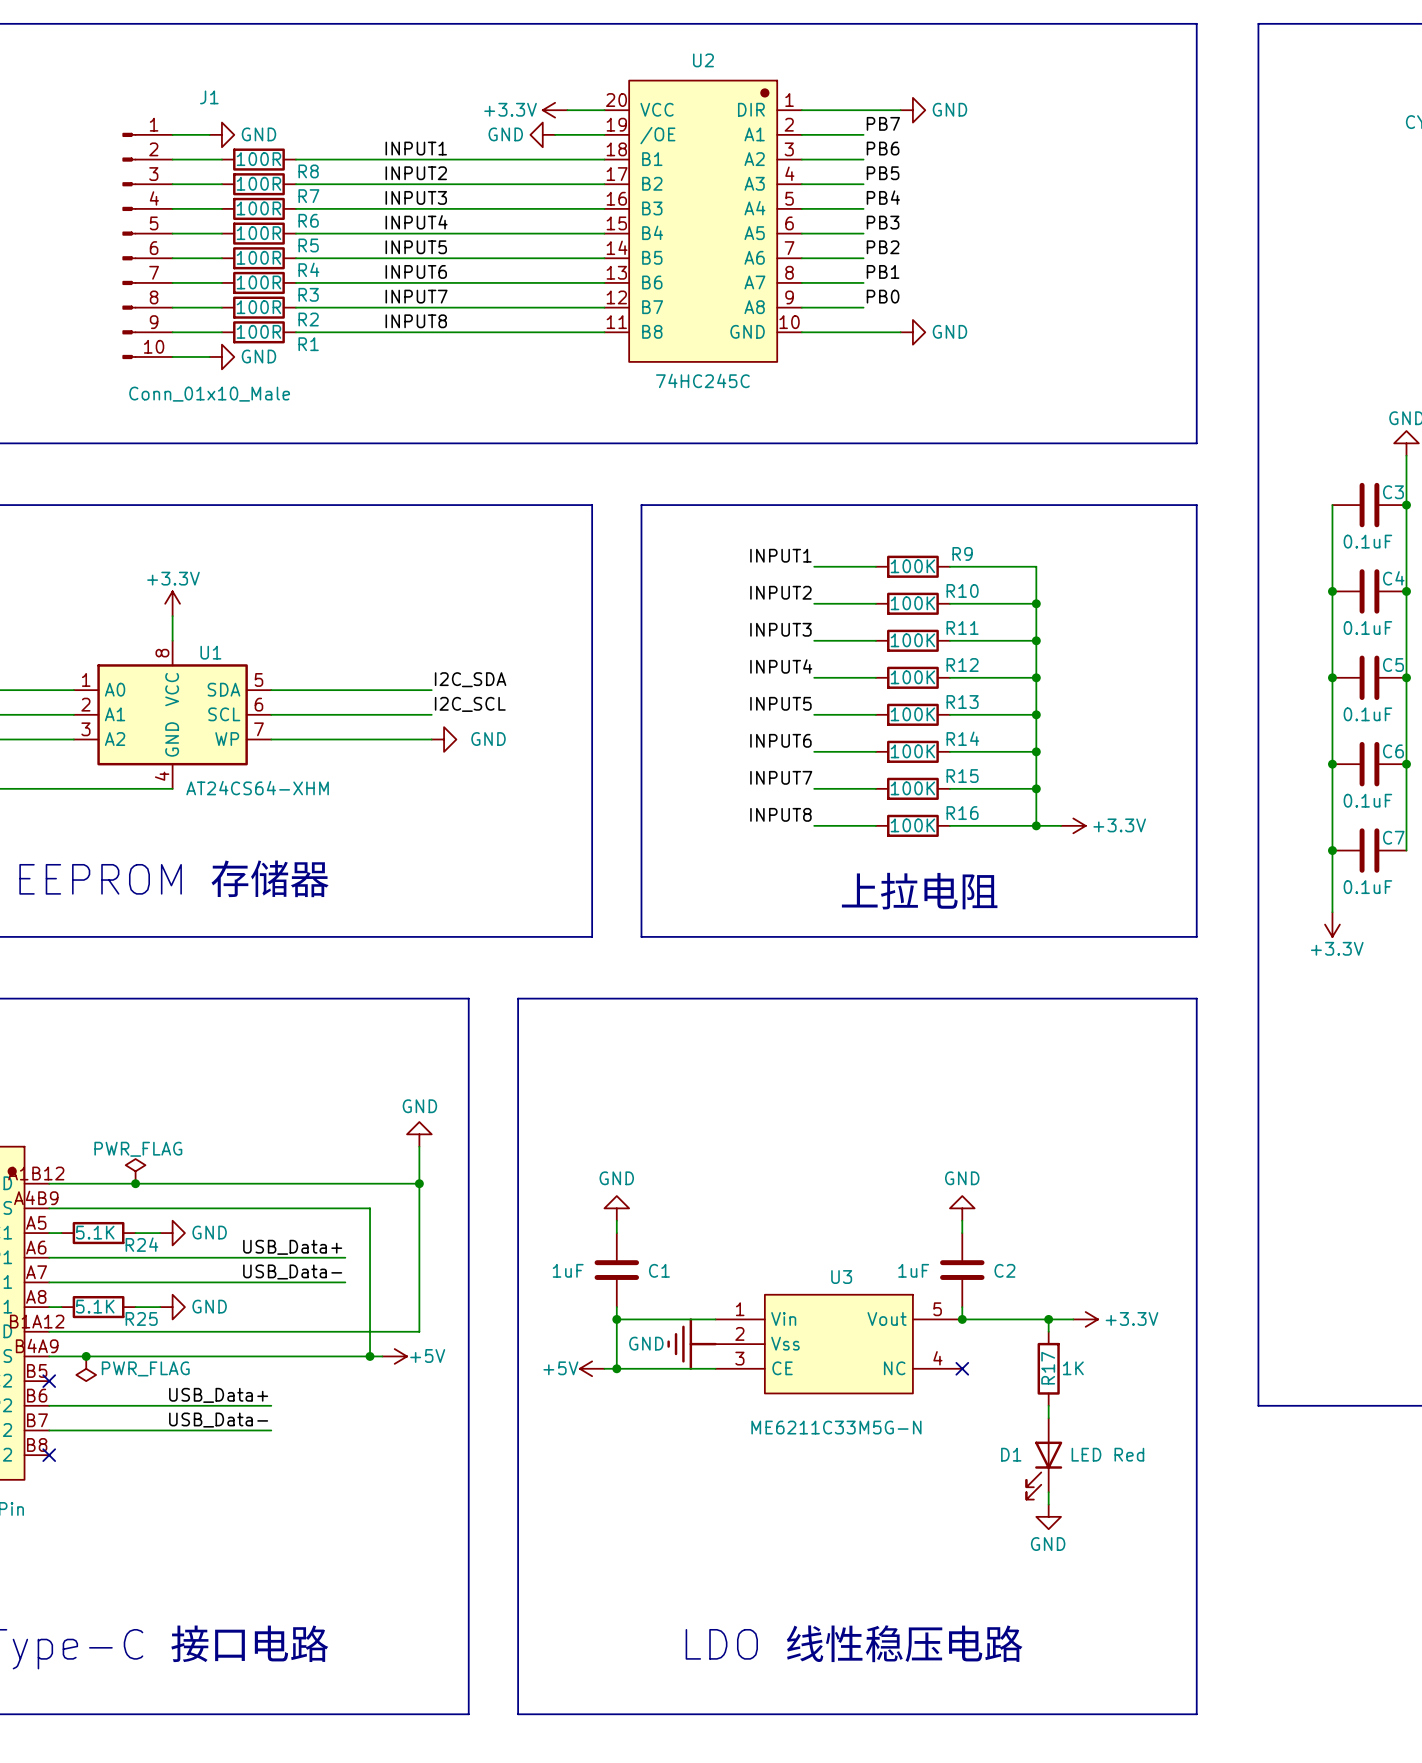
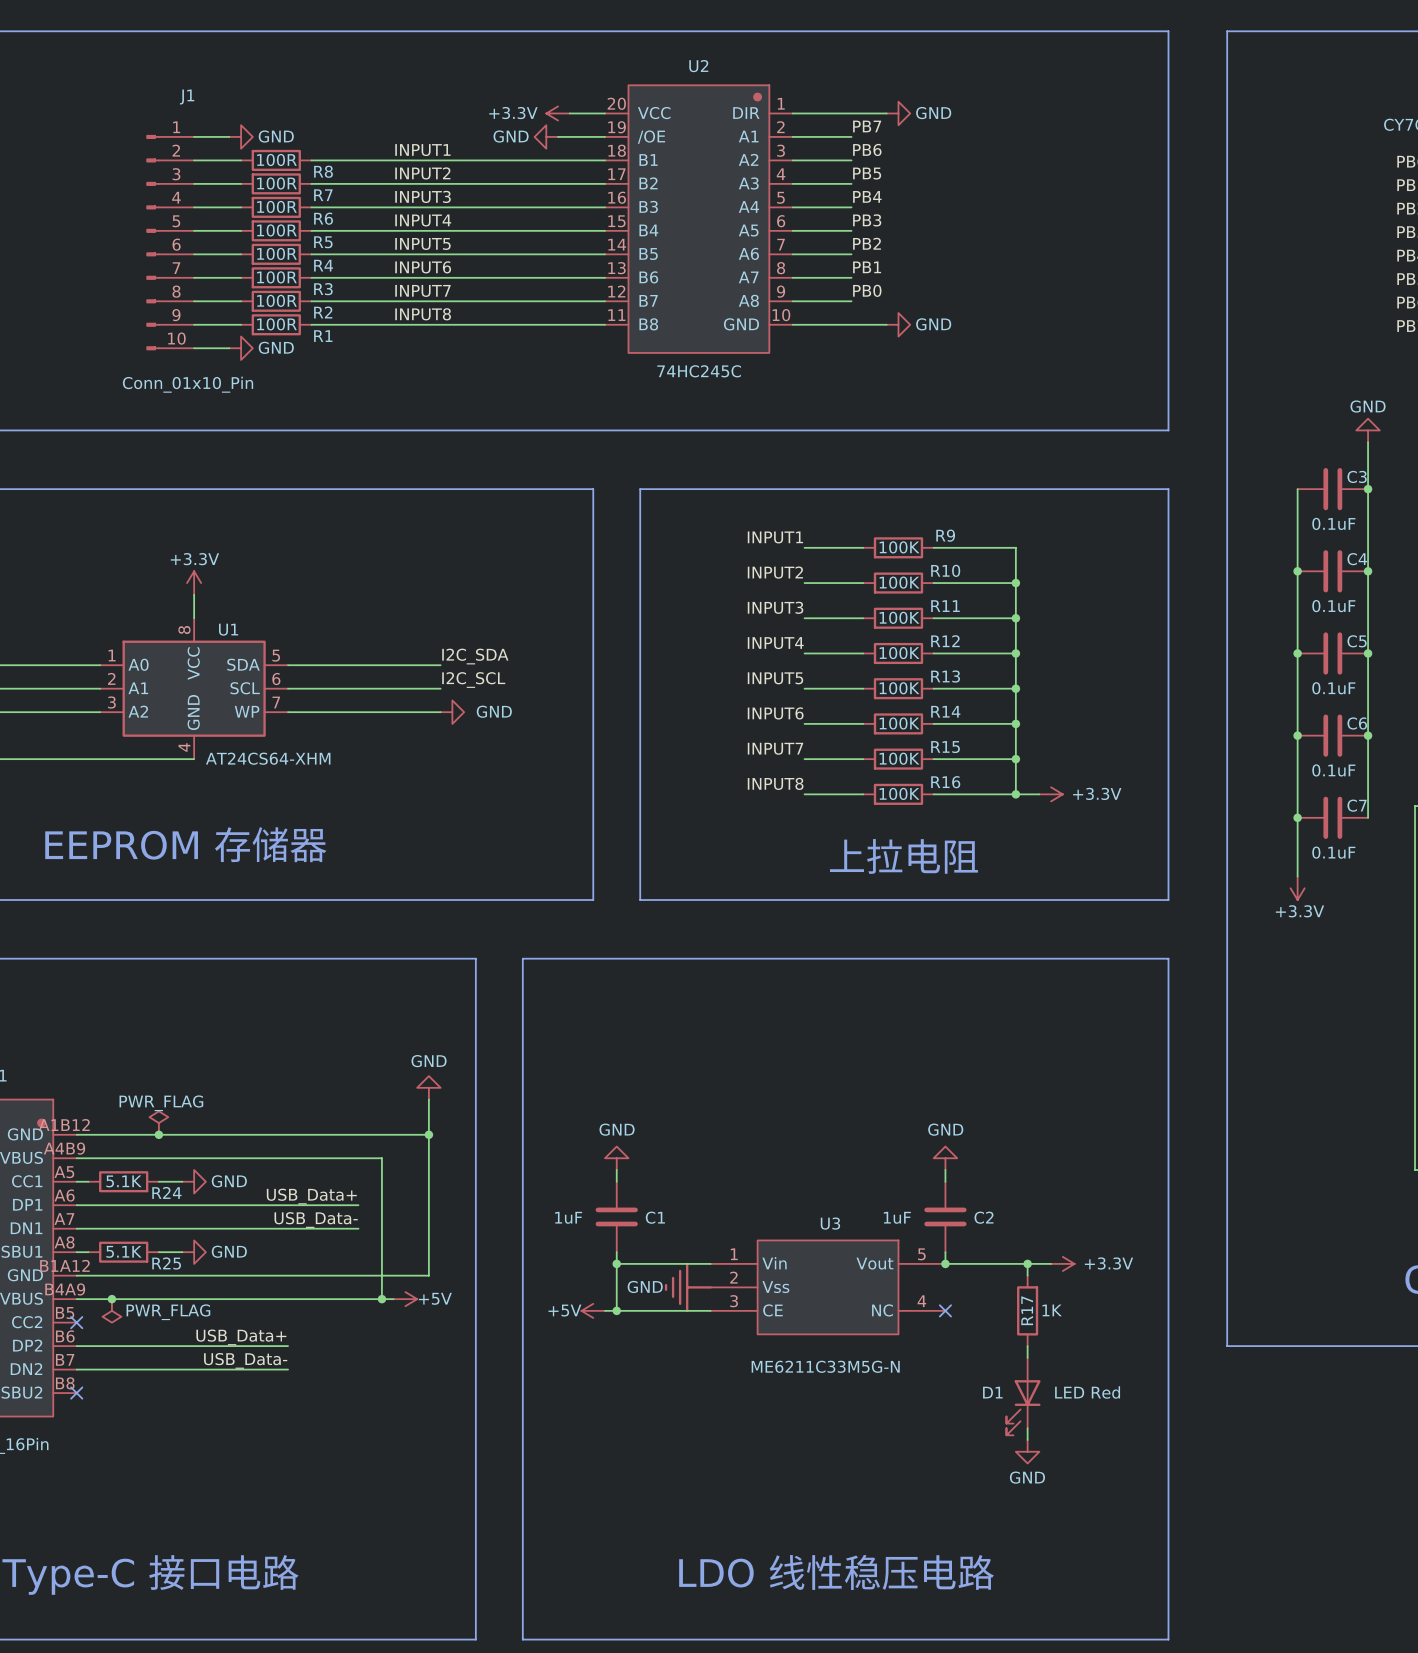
J1 name position: J1 (209, 97) -> J1 (187, 97)
J1 value: Conn_01x10_Male (209, 394) -> Conn_01x10_Pin (188, 384)

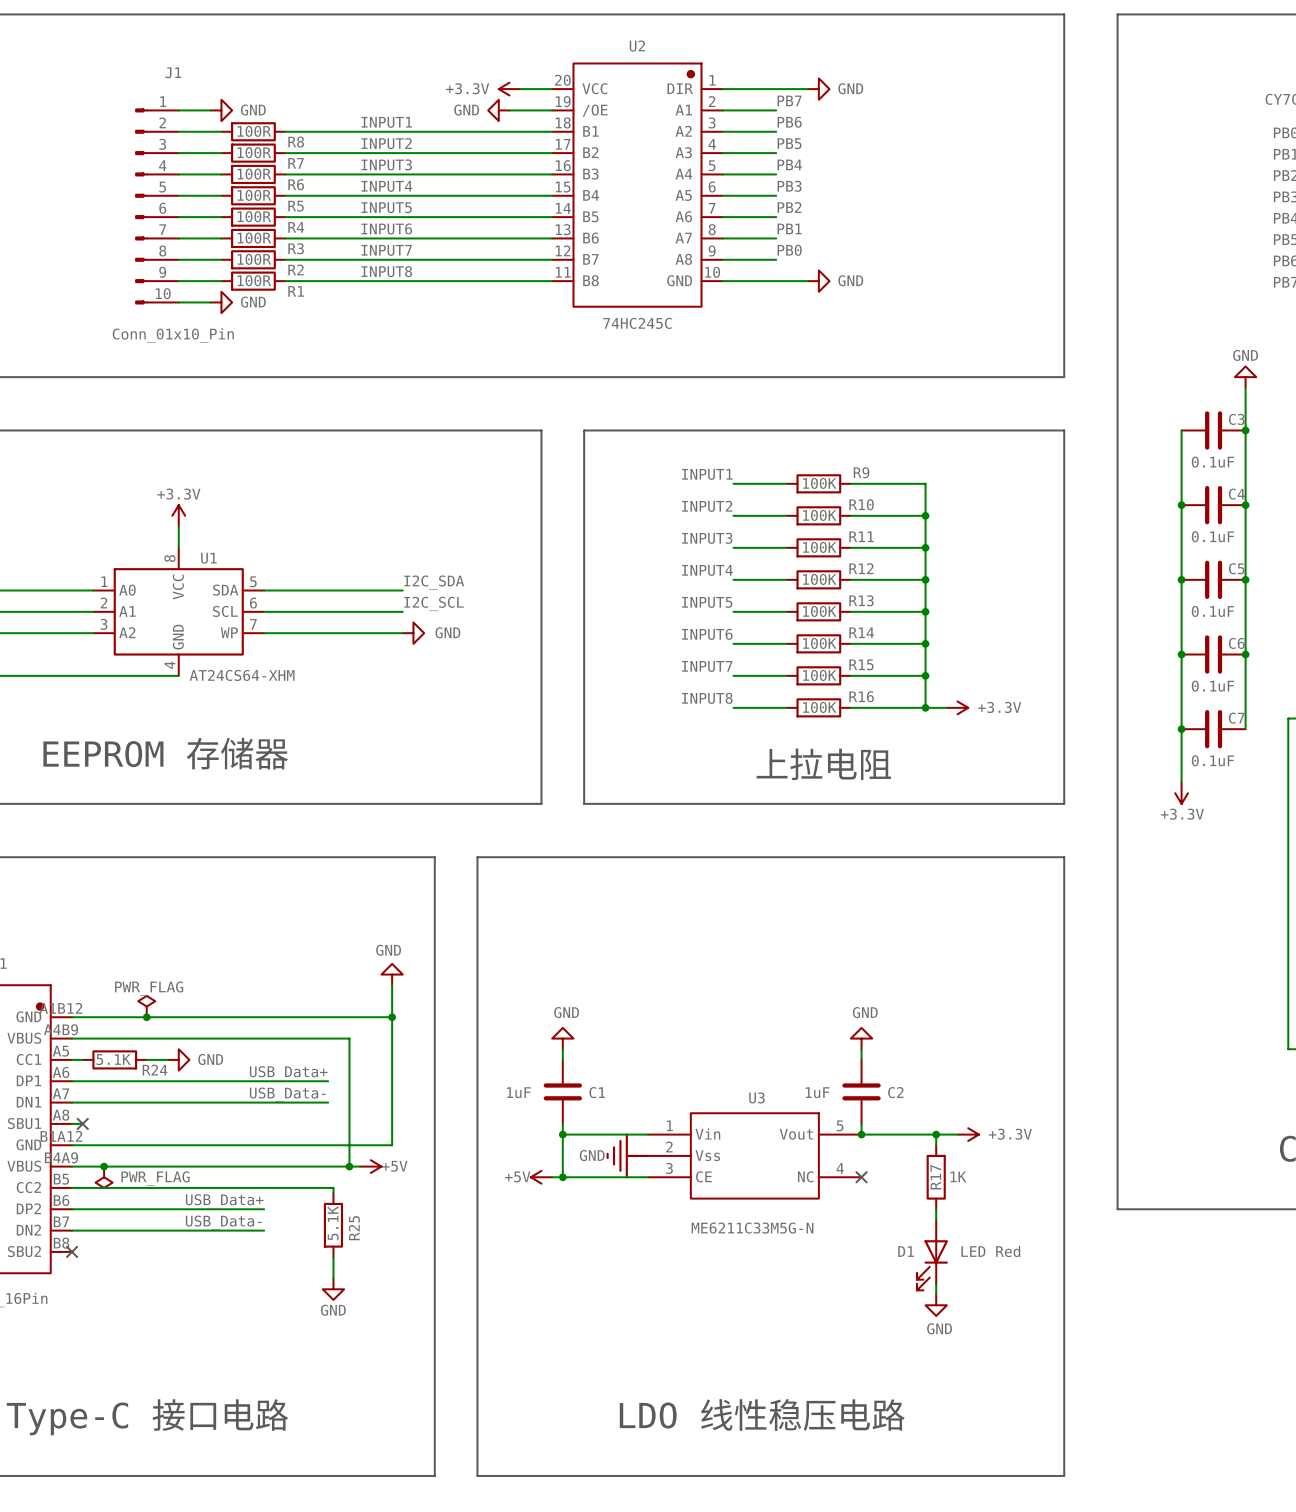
no-connect mark: none -> (82, 1123)
R25 rotation: 0° (123, 1252) -> 90° clockwise (333, 1225)
R25 position: (123, 1252) -> (333, 1225)
wire: (158, 1252) (182, 1252) -> none
power symbol: GND (194, 1252) -> none
R25 name position: R25 (166, 1263) -> R25 (354, 1228)
wire: none -> (72, 1187) (333, 1187) (333, 1193)
no-connect mark: (76, 1322) -> none
wire: none -> (333, 1257) (333, 1278)
power symbol: none -> GND (333, 1289)

